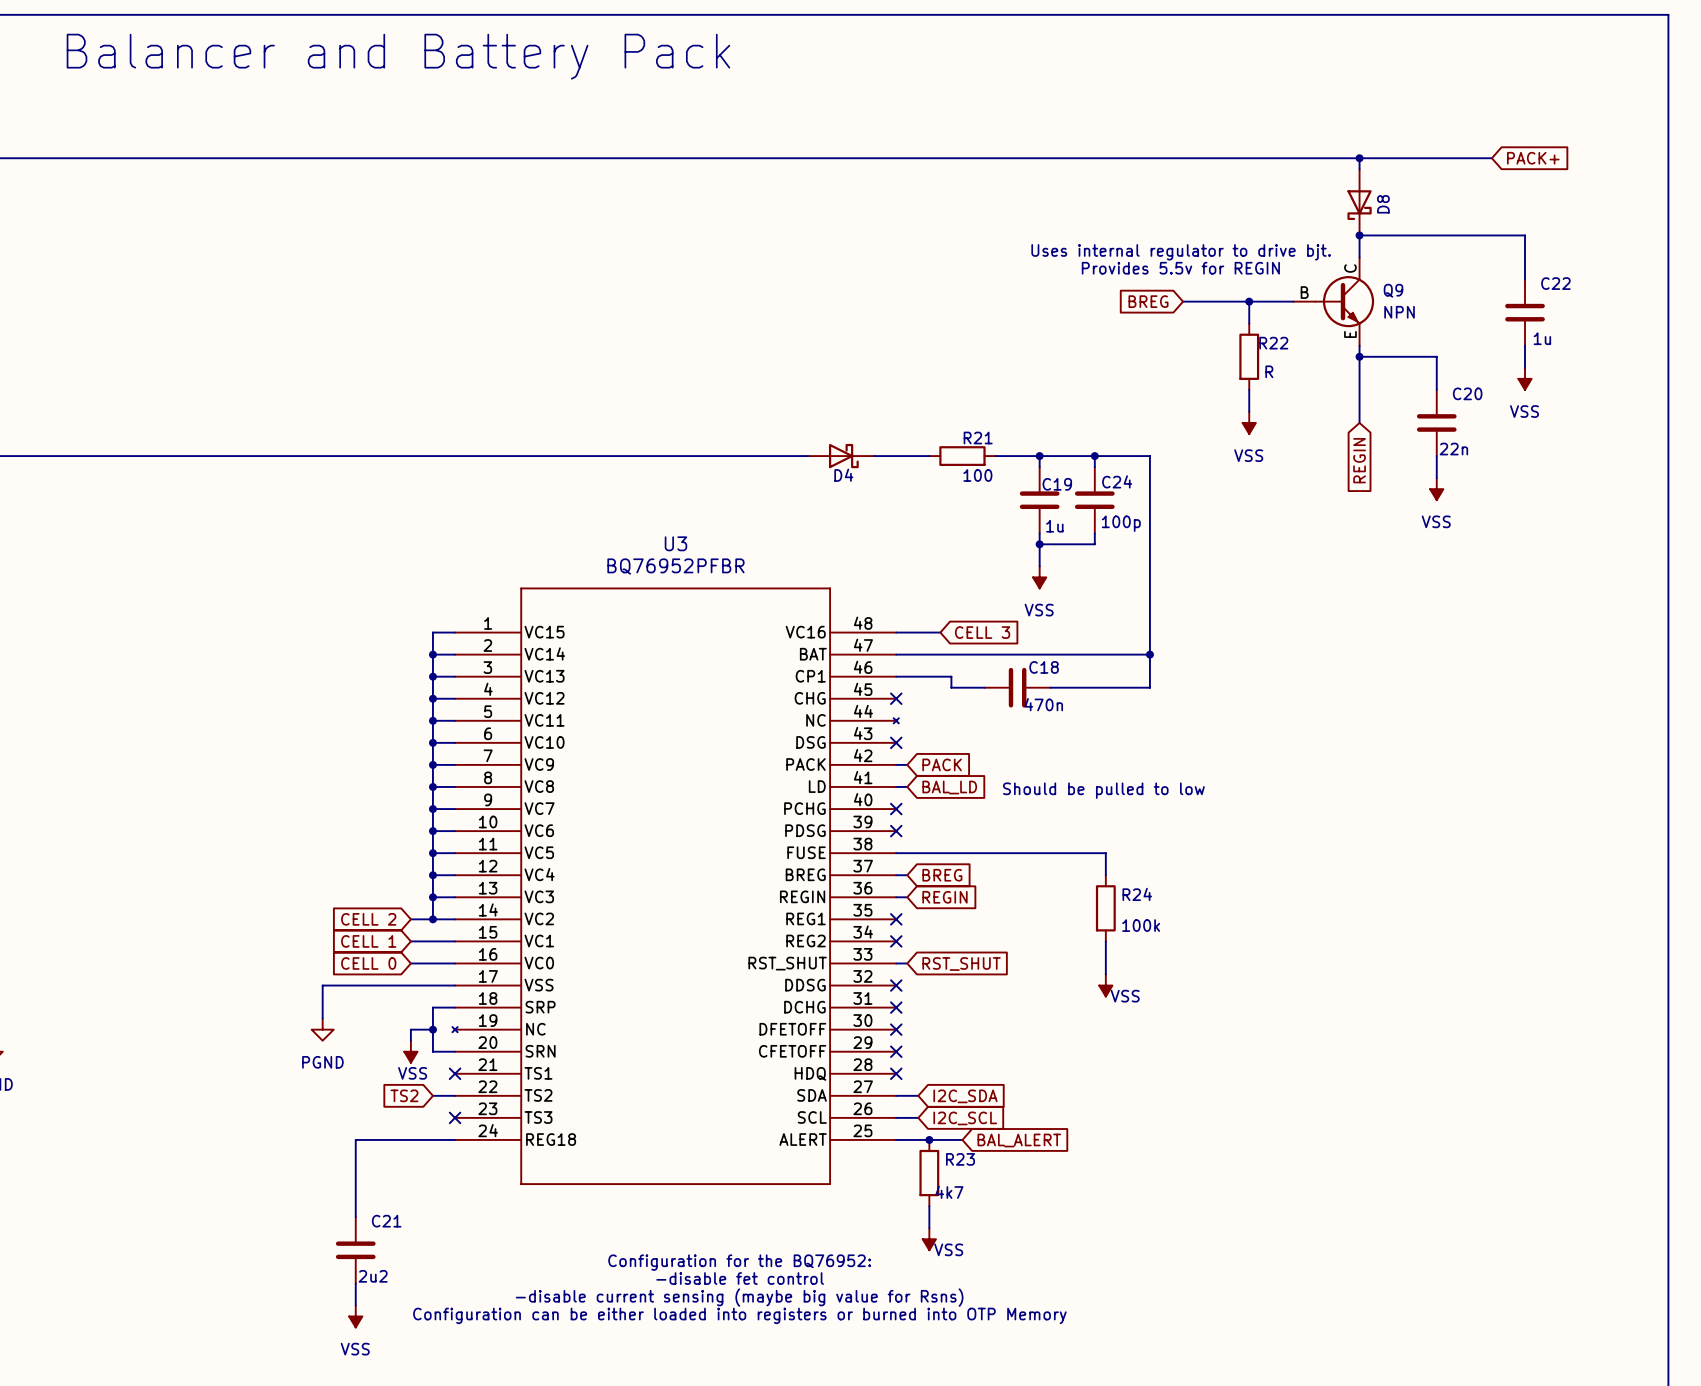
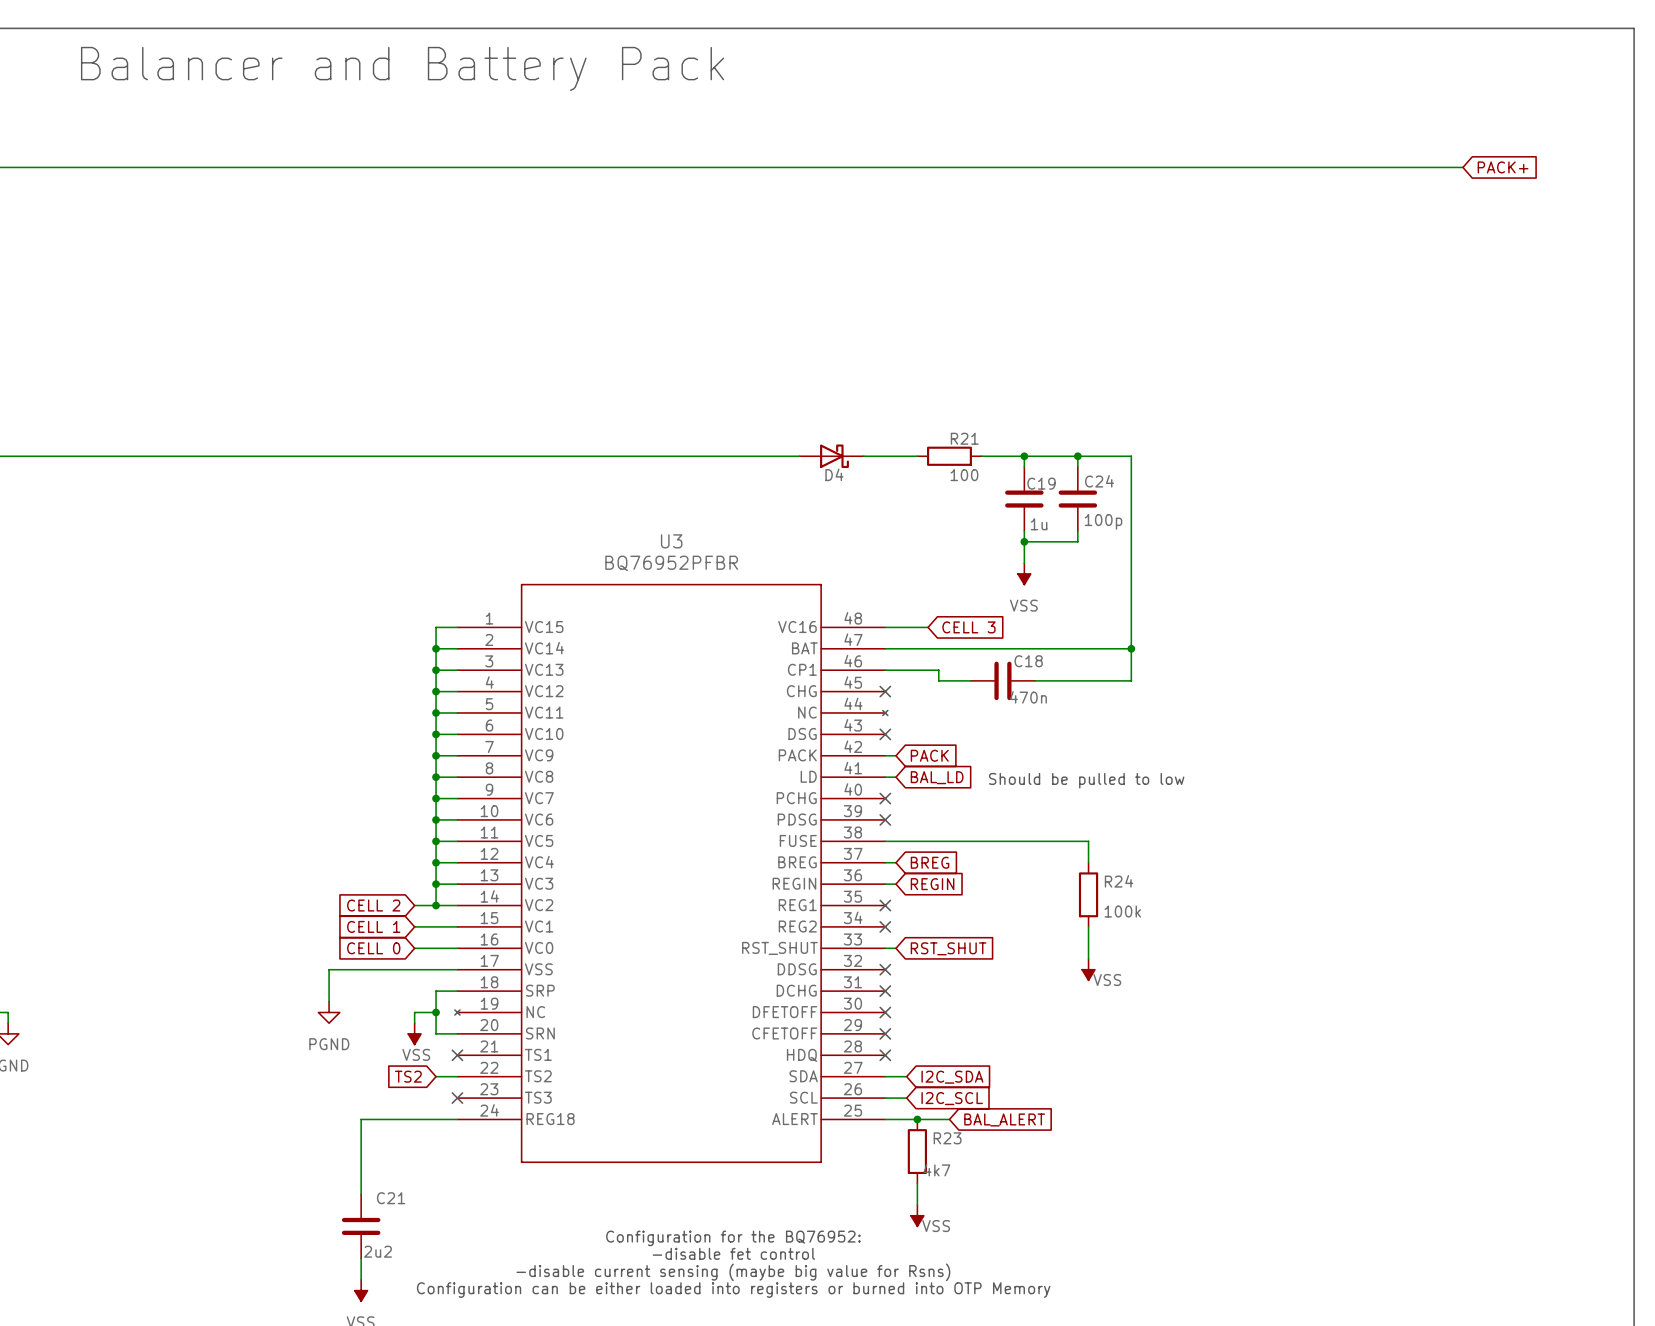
wire: (1359, 158) (1359, 169) -> none
junction: (1359, 158) -> none
D8: (1359, 202) -> none
junction: (1359, 235) -> none
text: Uses internal regulator to drive bjt. (1181, 252) -> none
wire: (1359, 257) (1359, 235) (1525, 235) (1525, 279) -> none
text: Provides 5.5v for REGIN (1180, 268) -> none
global label: BREG (1148, 301) -> none
wire: (1183, 301) (1293, 301) -> none
wire: (1249, 301) (1249, 323) -> none
junction: (1249, 301) -> none
Q9: NPN (1333, 301) -> none
C22: 1u (1525, 312) -> none
wire: (1359, 345) (1359, 422) -> none
wire: (1525, 345) (1525, 367) -> none
R22: R (1249, 356) -> none
wire: (1359, 356) (1436, 356) (1436, 389) -> none
junction: (1359, 356) -> none
power symbol: VSS (1525, 378) -> none
wire: (1249, 389) (1249, 411) -> none
power symbol: VSS (1249, 422) -> none
C20: 22n (1436, 422) -> none
wire: (1436, 456) (1436, 478) -> none
global label: REGIN (1359, 460) -> none
power symbol: VSS (1436, 489) -> none

